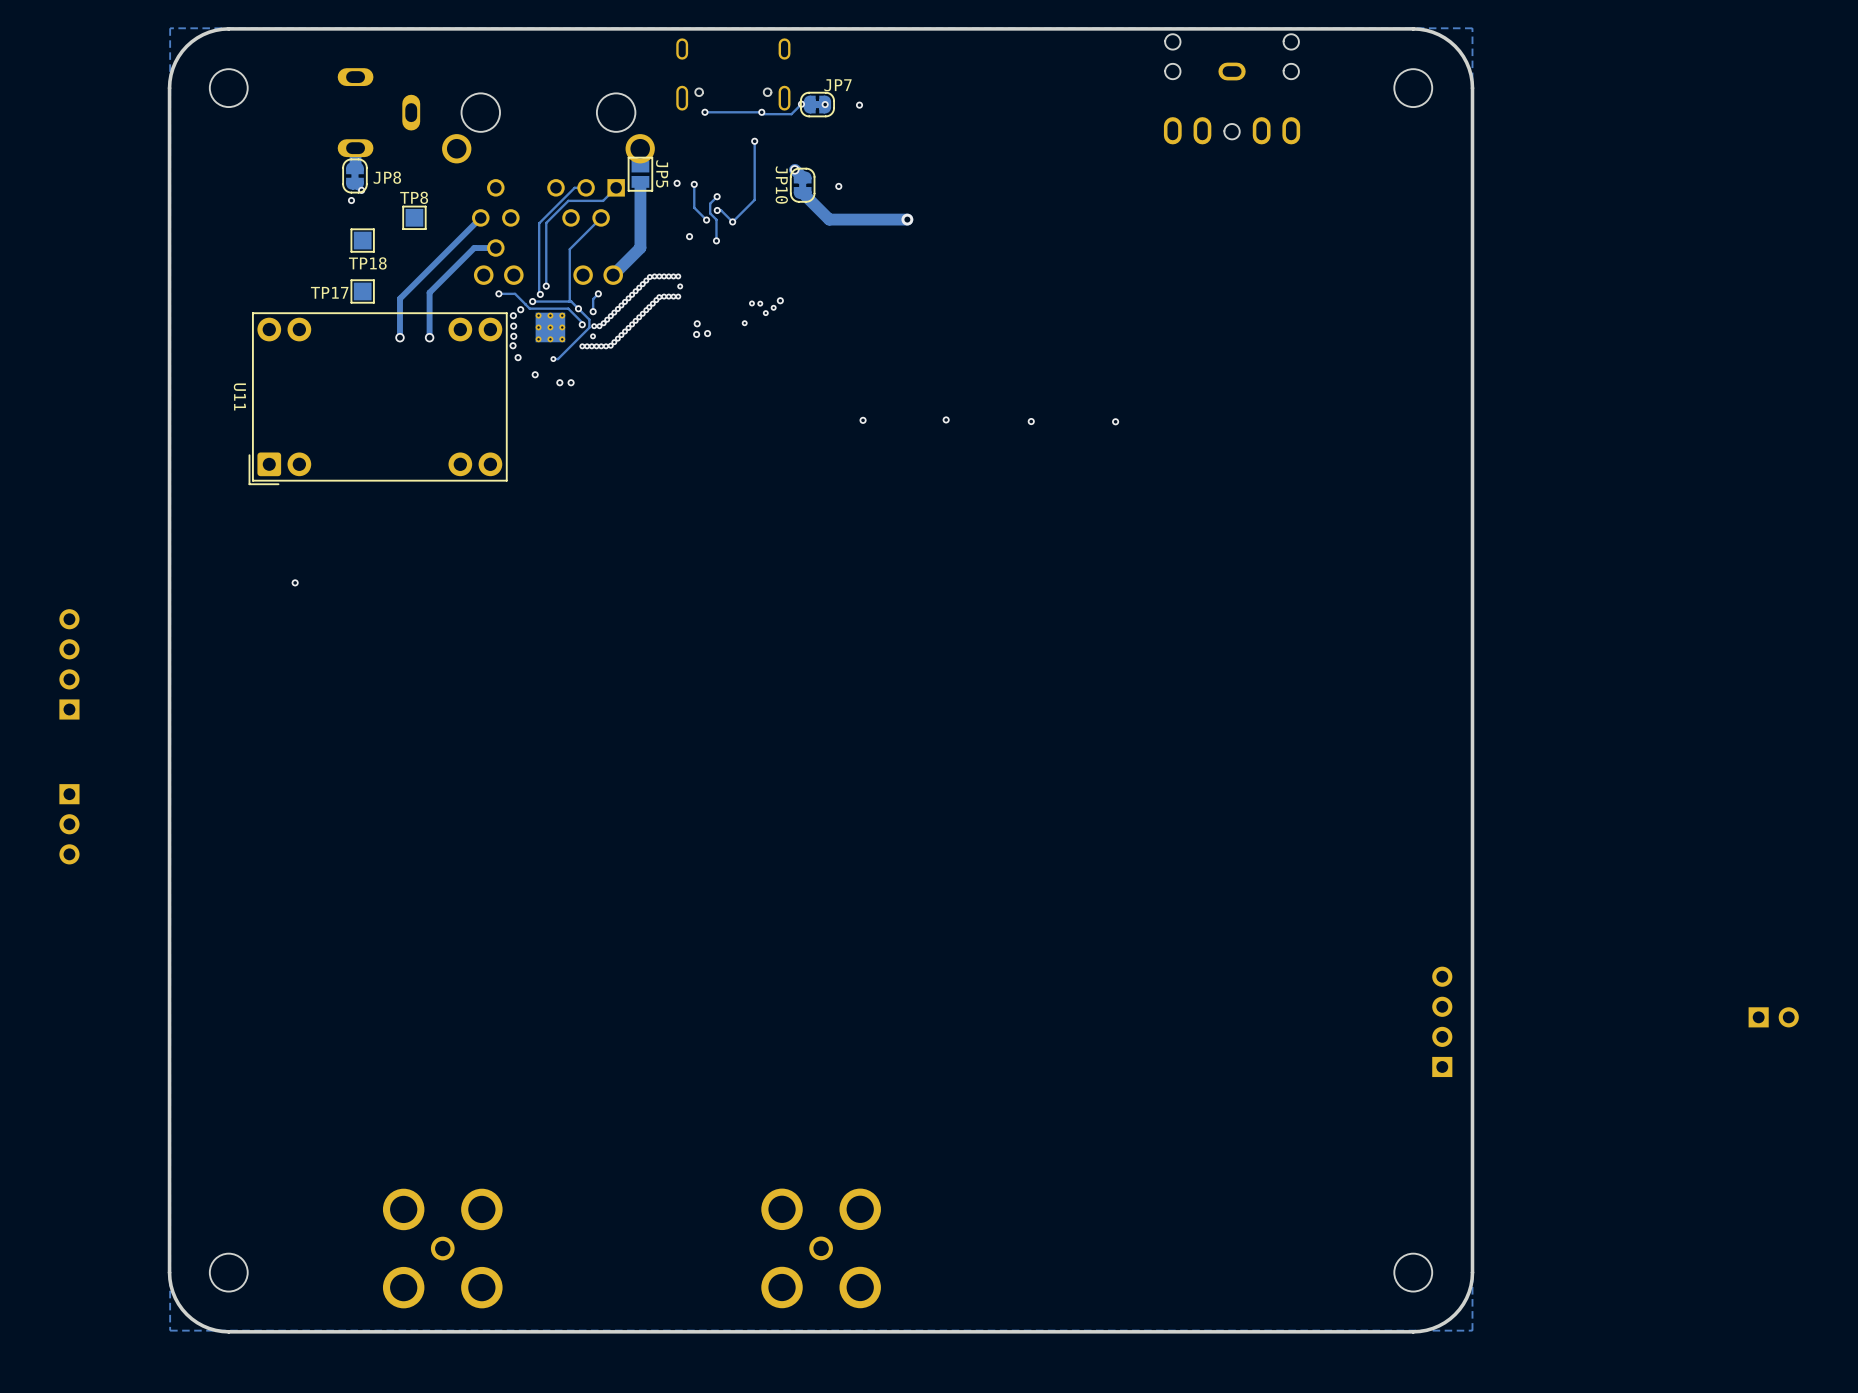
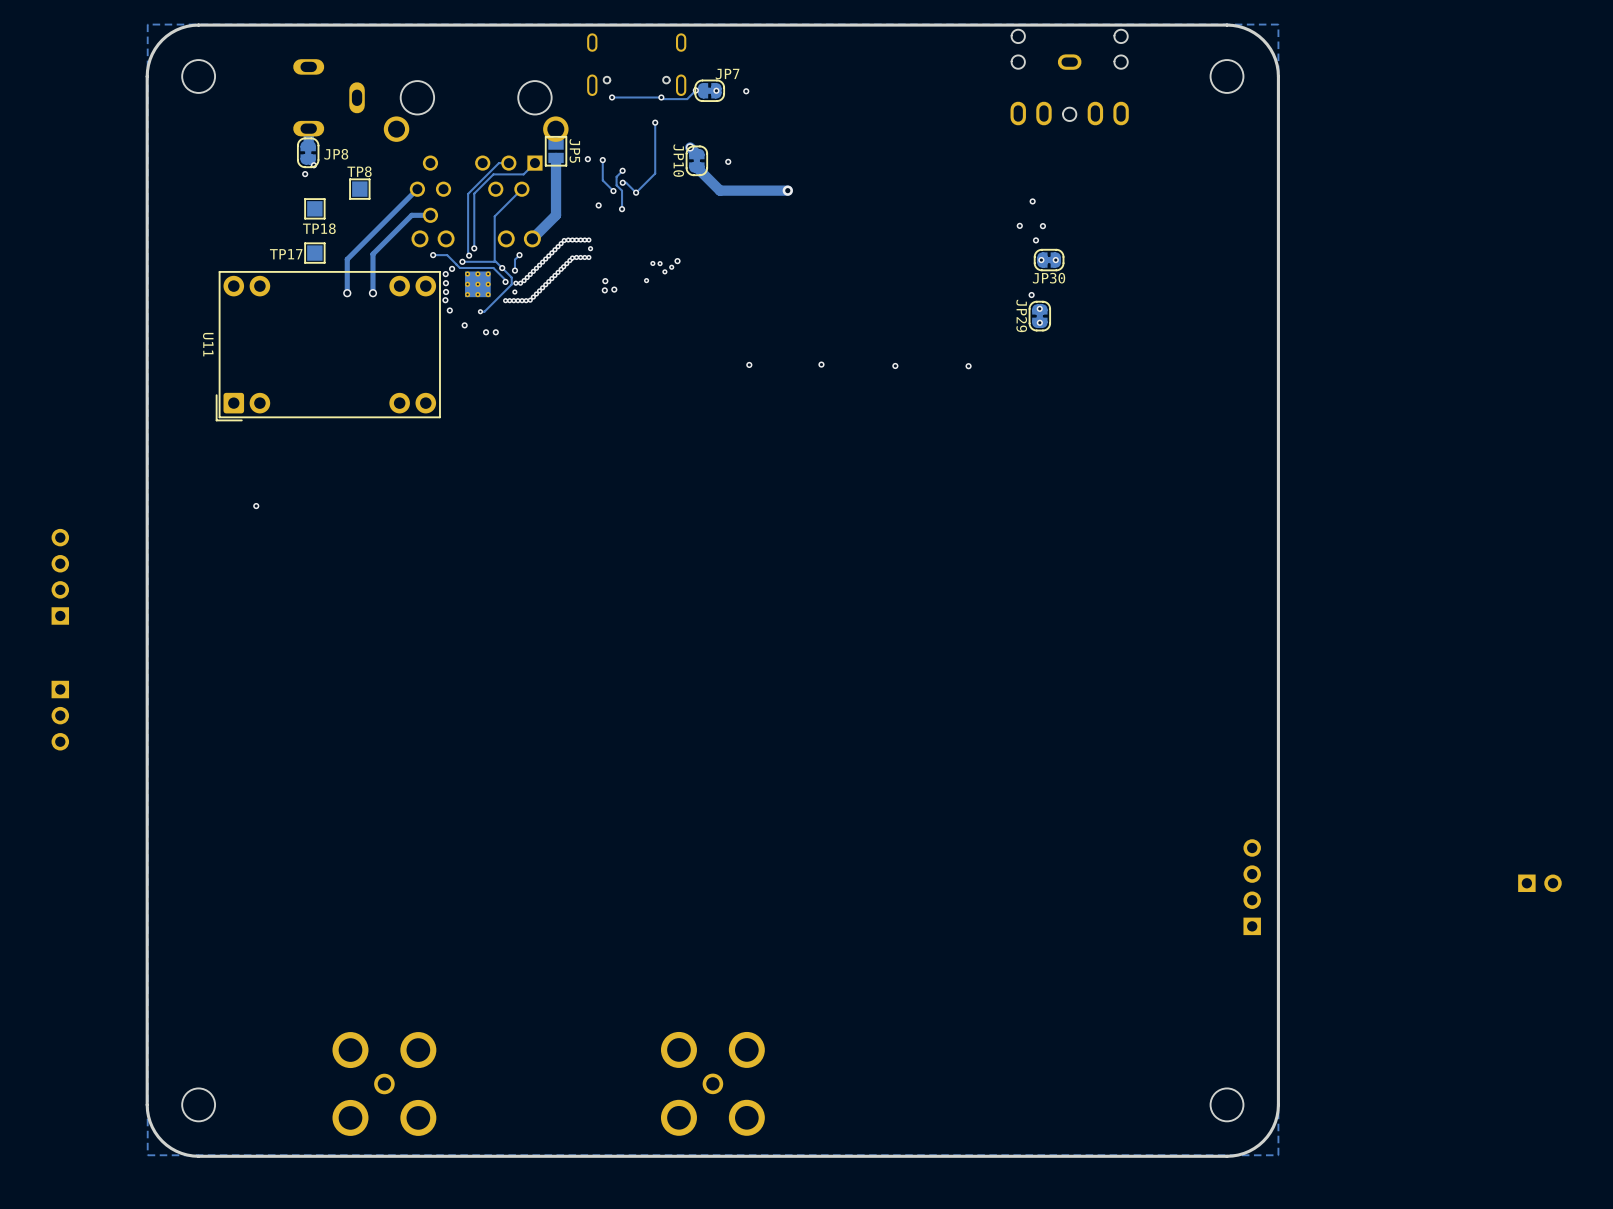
via: none -> (1032, 201)
via: none -> (1019, 225)
via: none -> (1042, 226)
via: none -> (1035, 240)
via: none -> (1041, 260)
JP30: none -> (1049, 260)
via: none -> (1055, 260)
via: none -> (1031, 295)
via: none -> (1039, 308)
JP29: none -> (1039, 316)
via: none -> (1039, 322)

